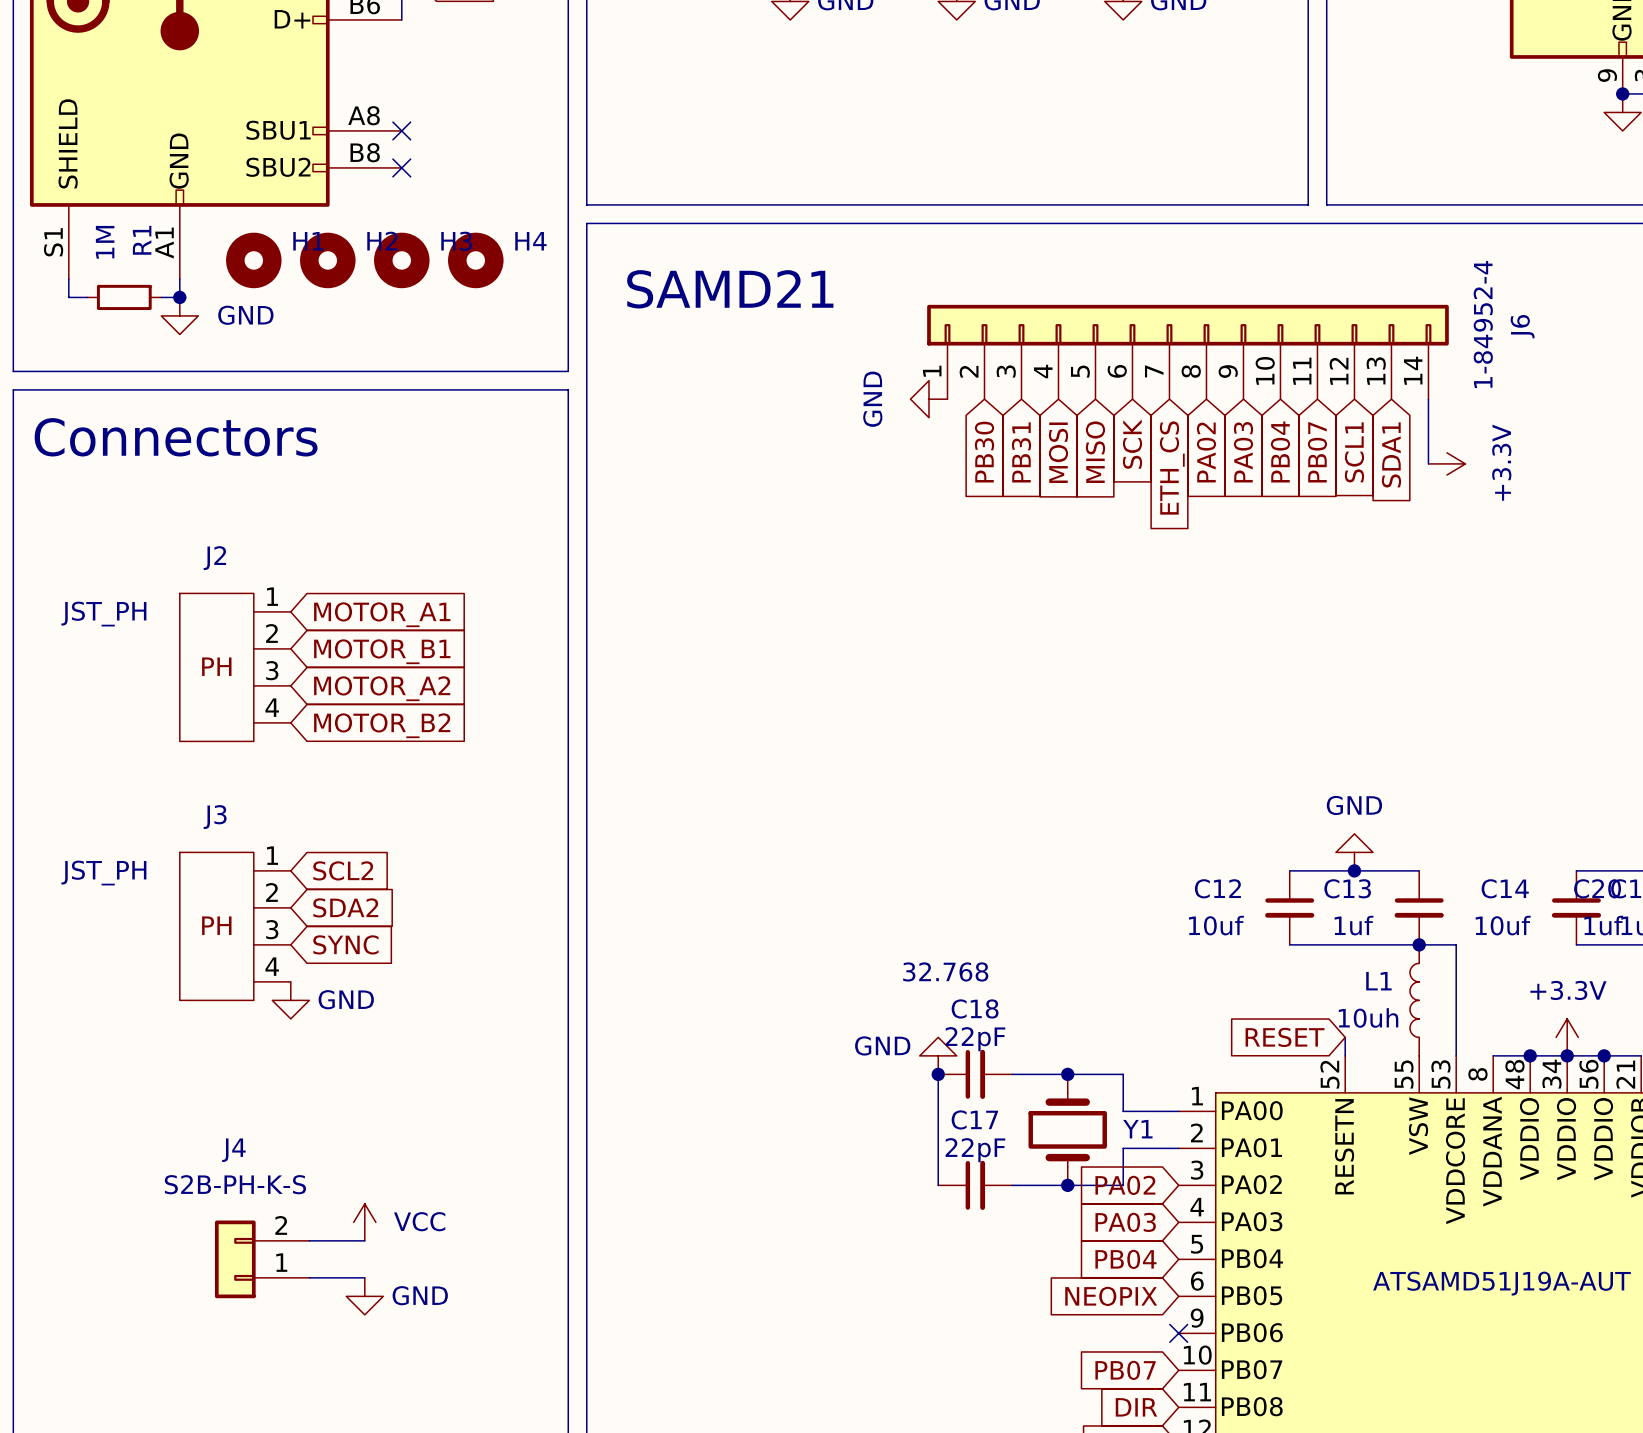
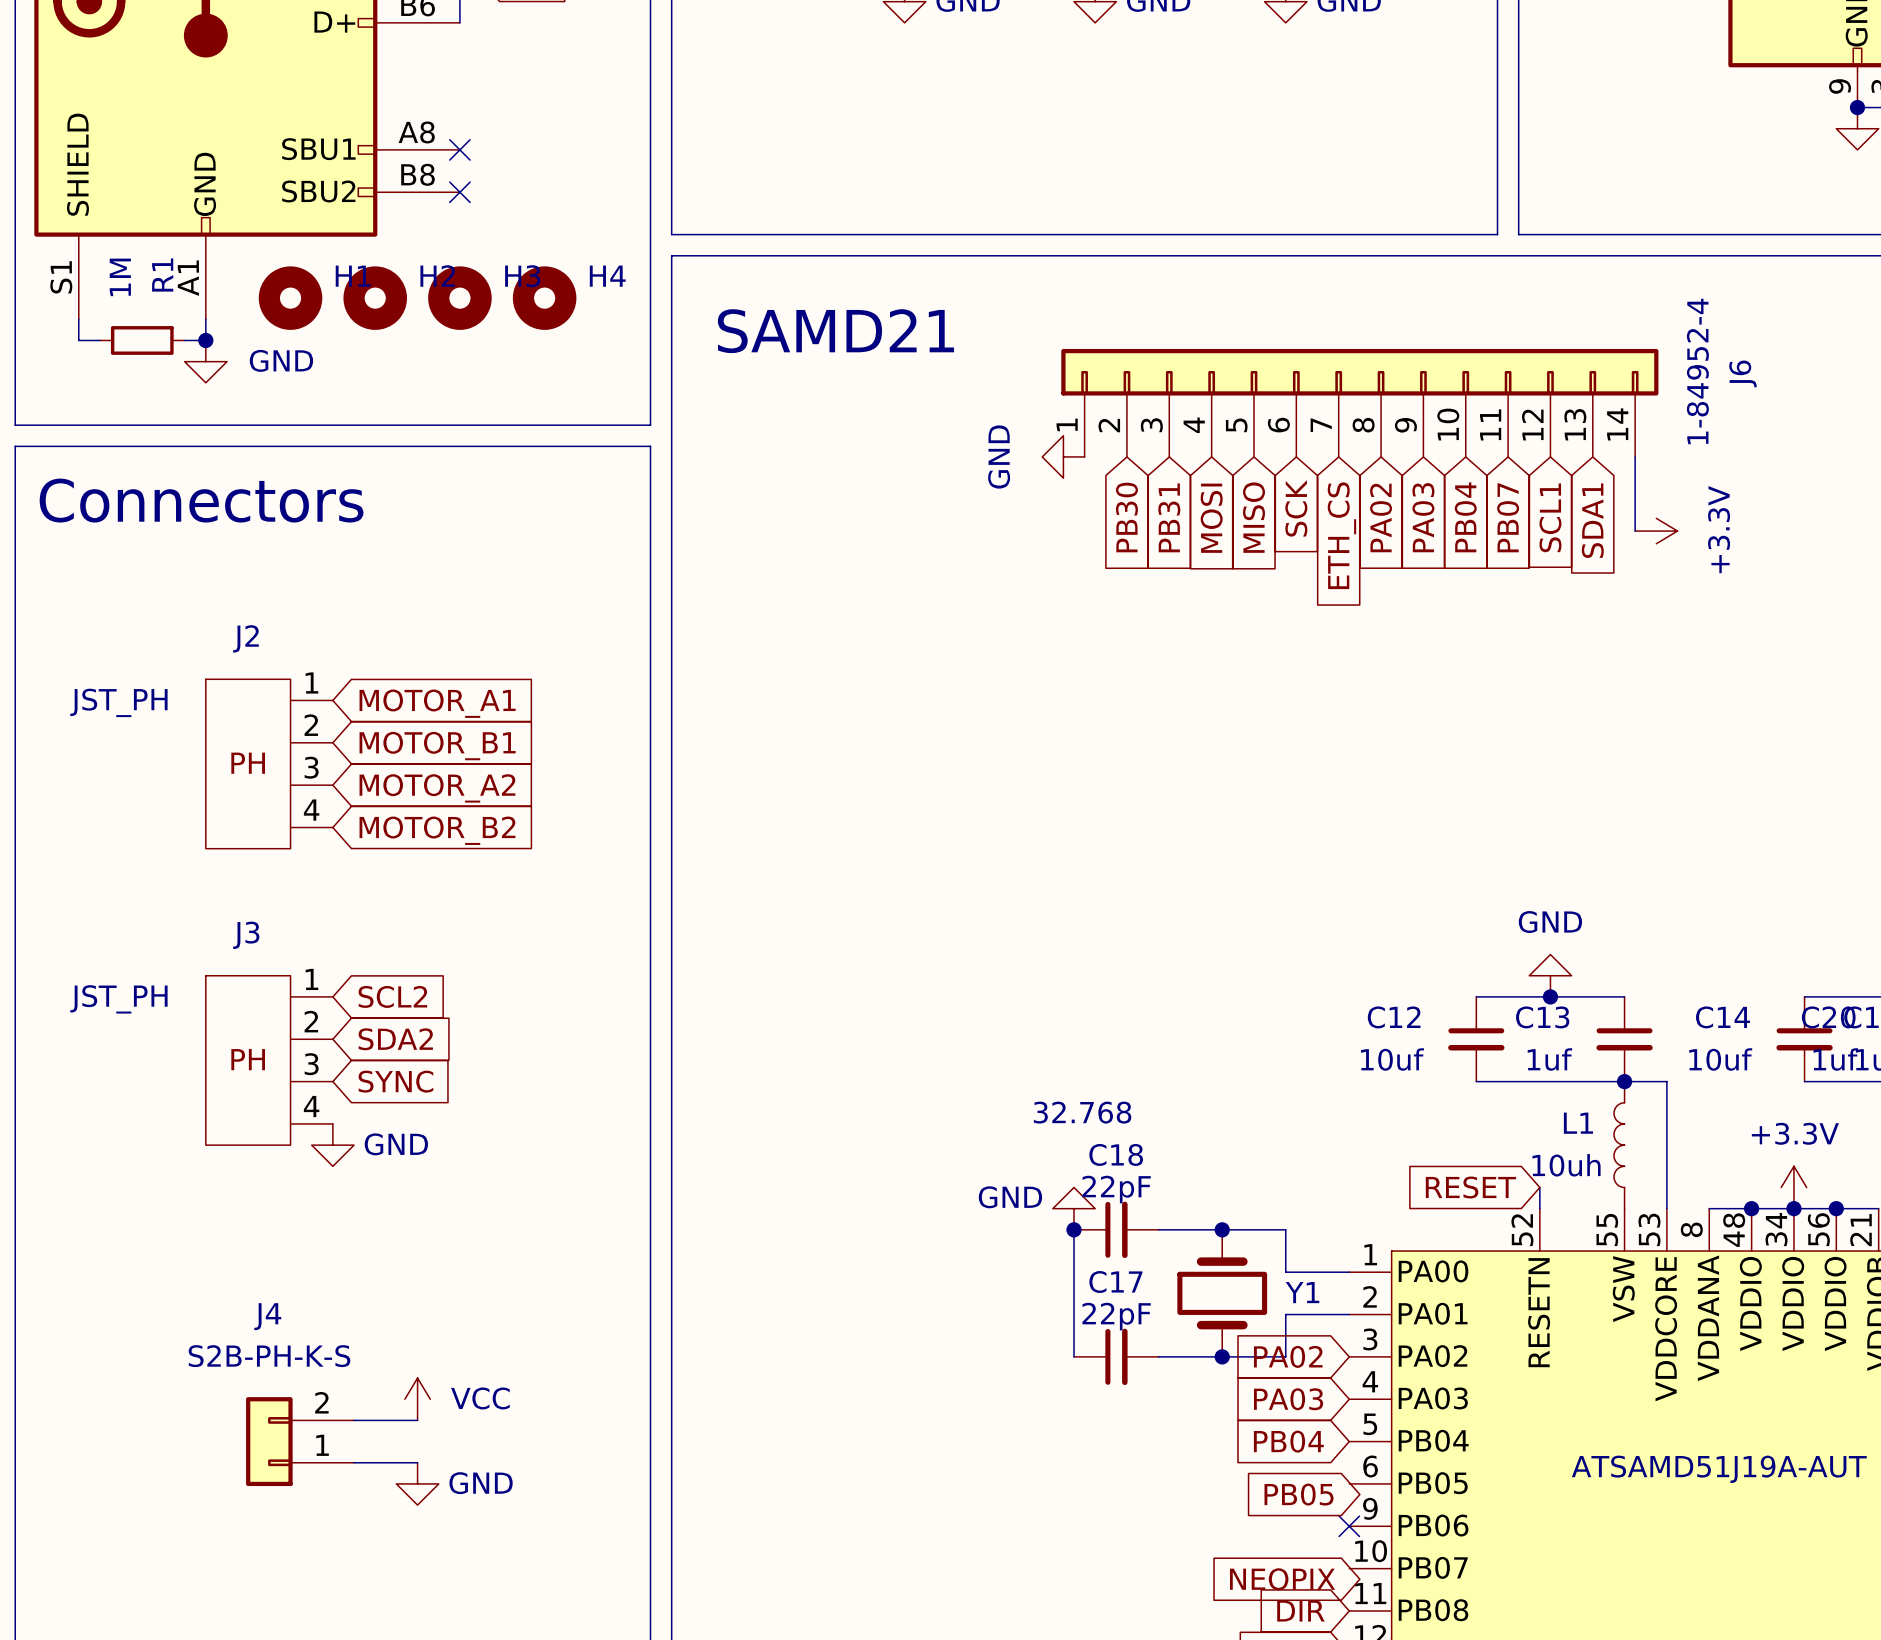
global label position: NEOPIX (1111, 1296) -> NEOPIX (1282, 1579)
global label: none -> PB05 (1299, 1494)
global label: PB07 (1125, 1370) -> none

